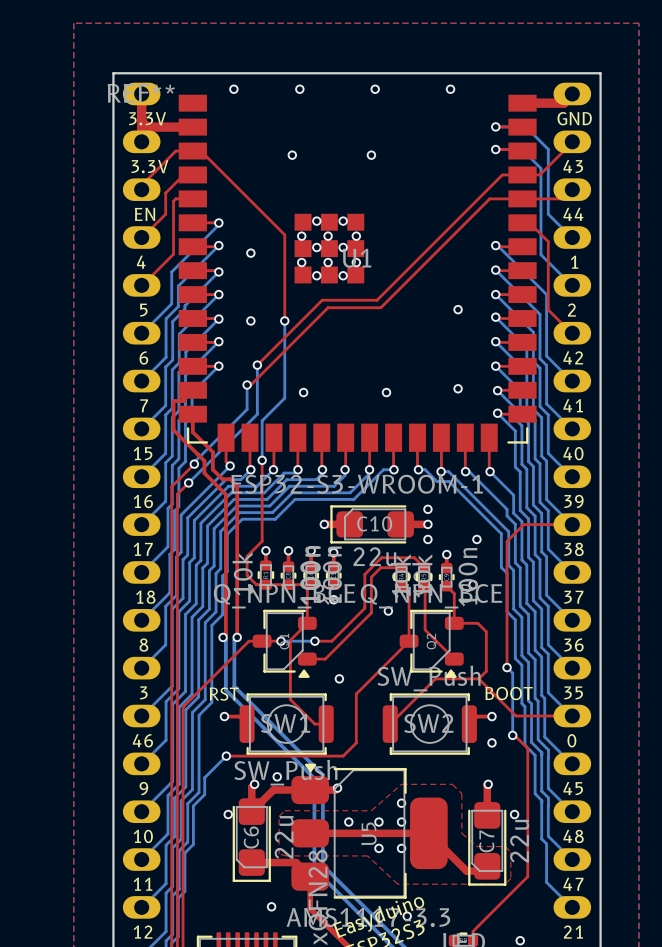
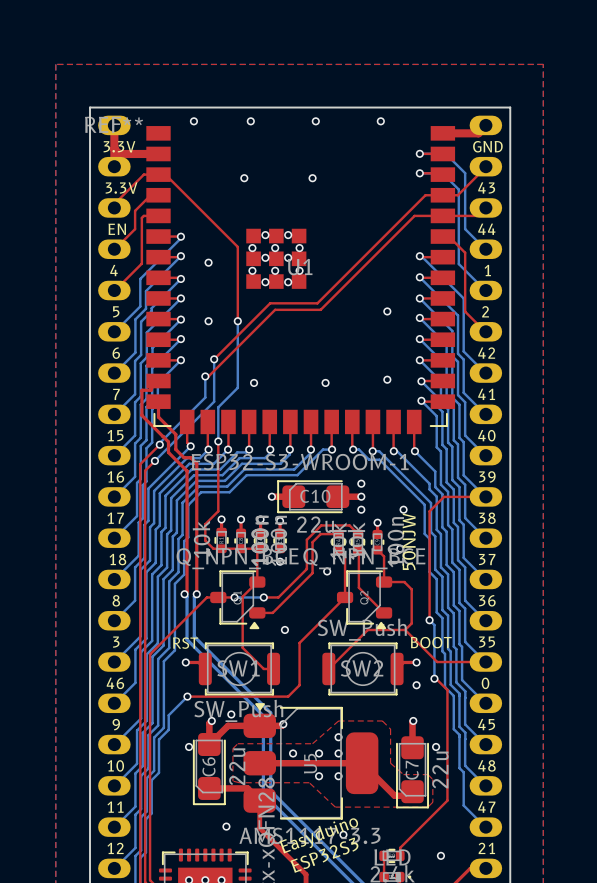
part text: none -> 50NJW (409, 541)

